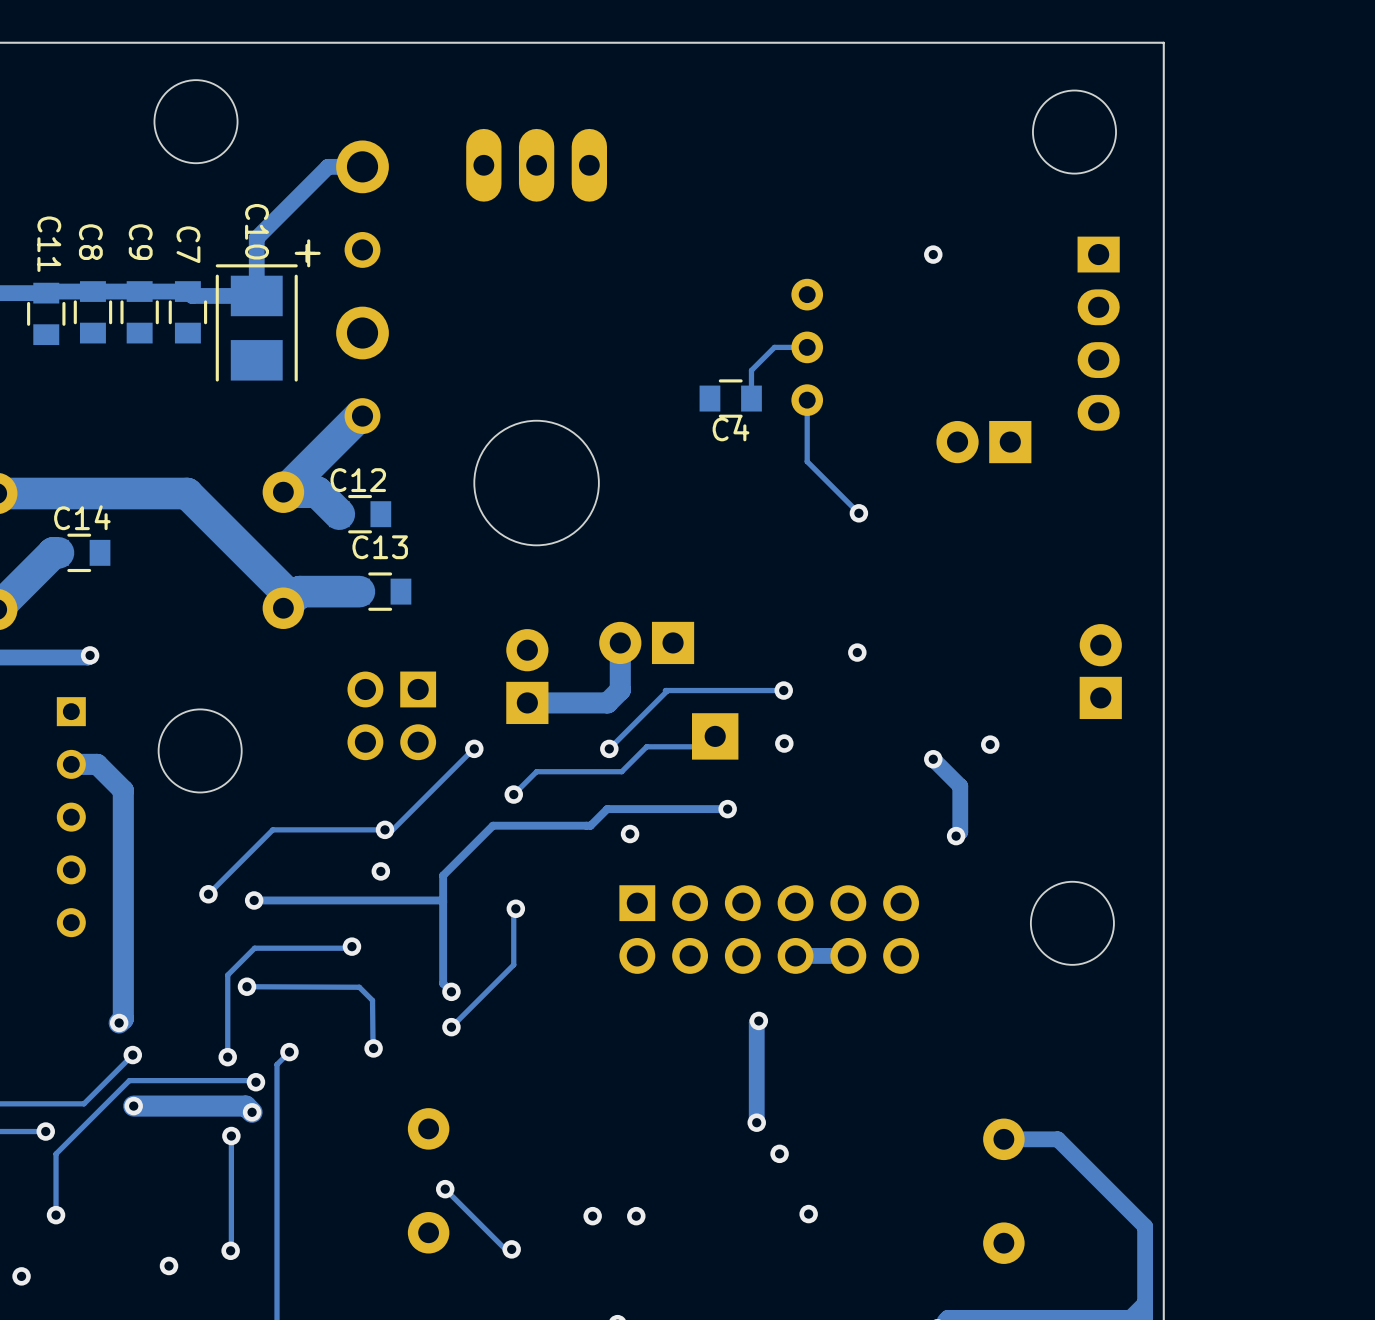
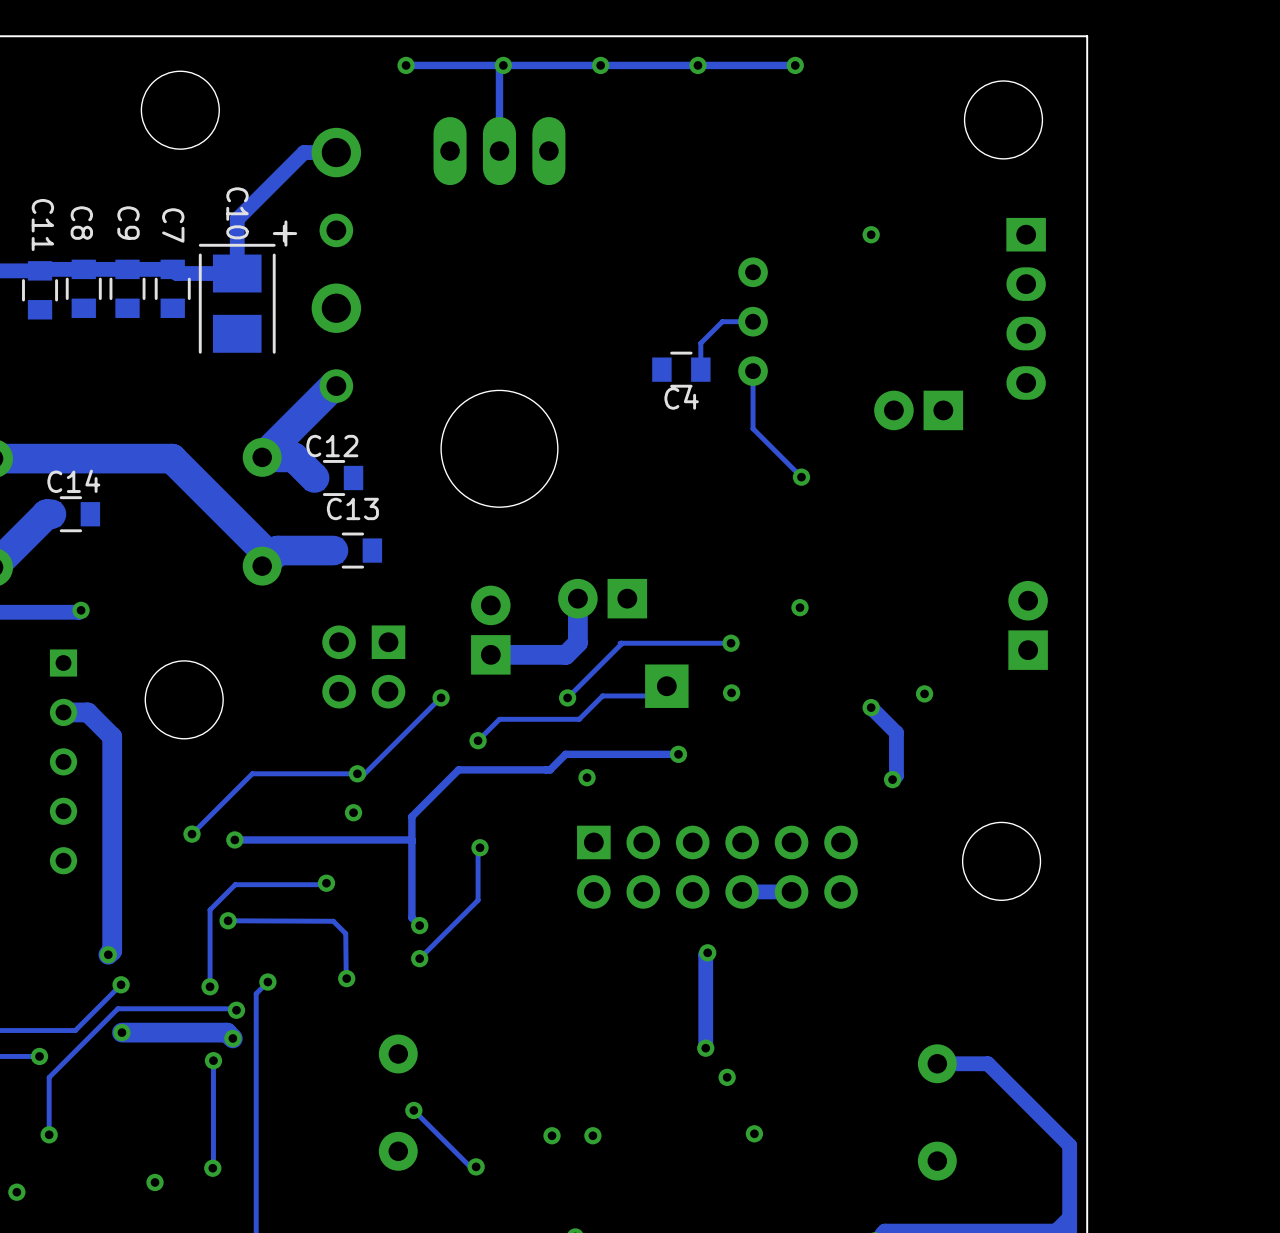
via: none -> (406, 65)
track: none -> (503, 65) (499, 69) (499, 151)
via: none -> (503, 65)
via: none -> (600, 65)
via: none -> (697, 65)
track: none -> (795, 65) (406, 65)
via: none -> (795, 65)

